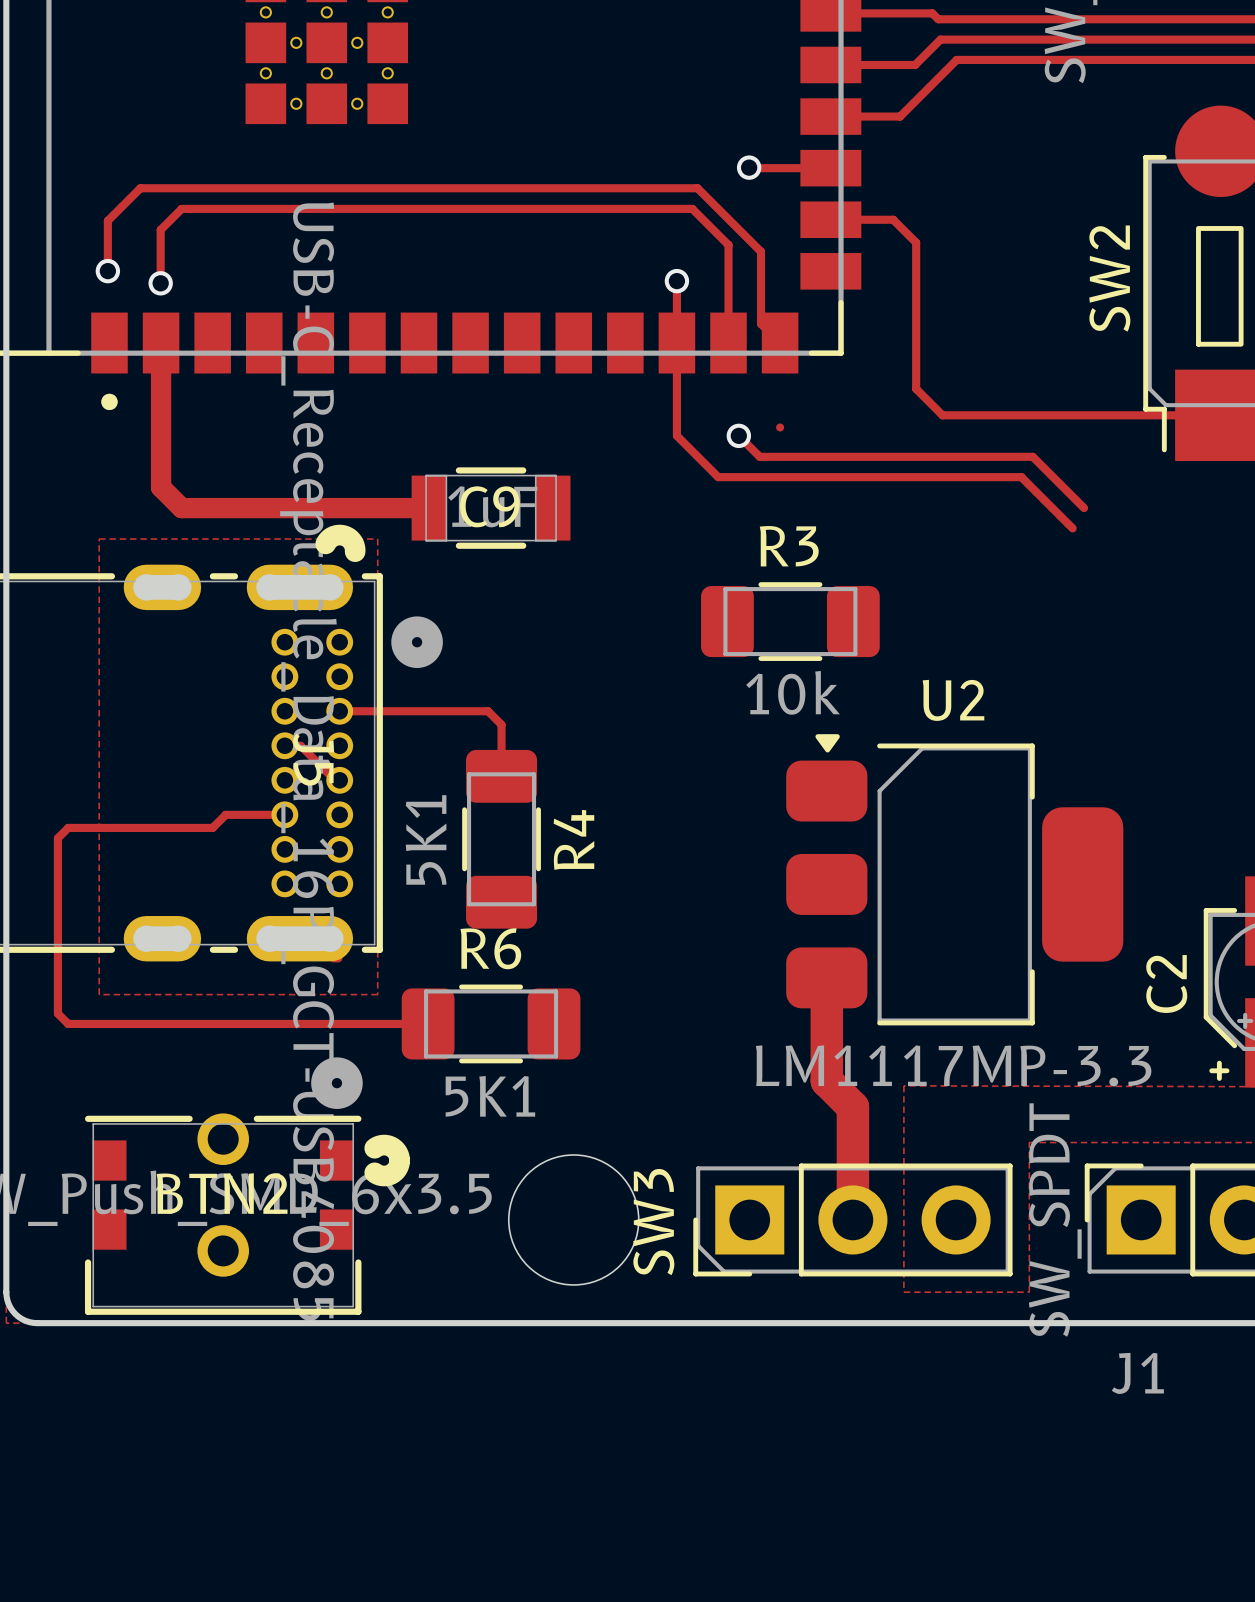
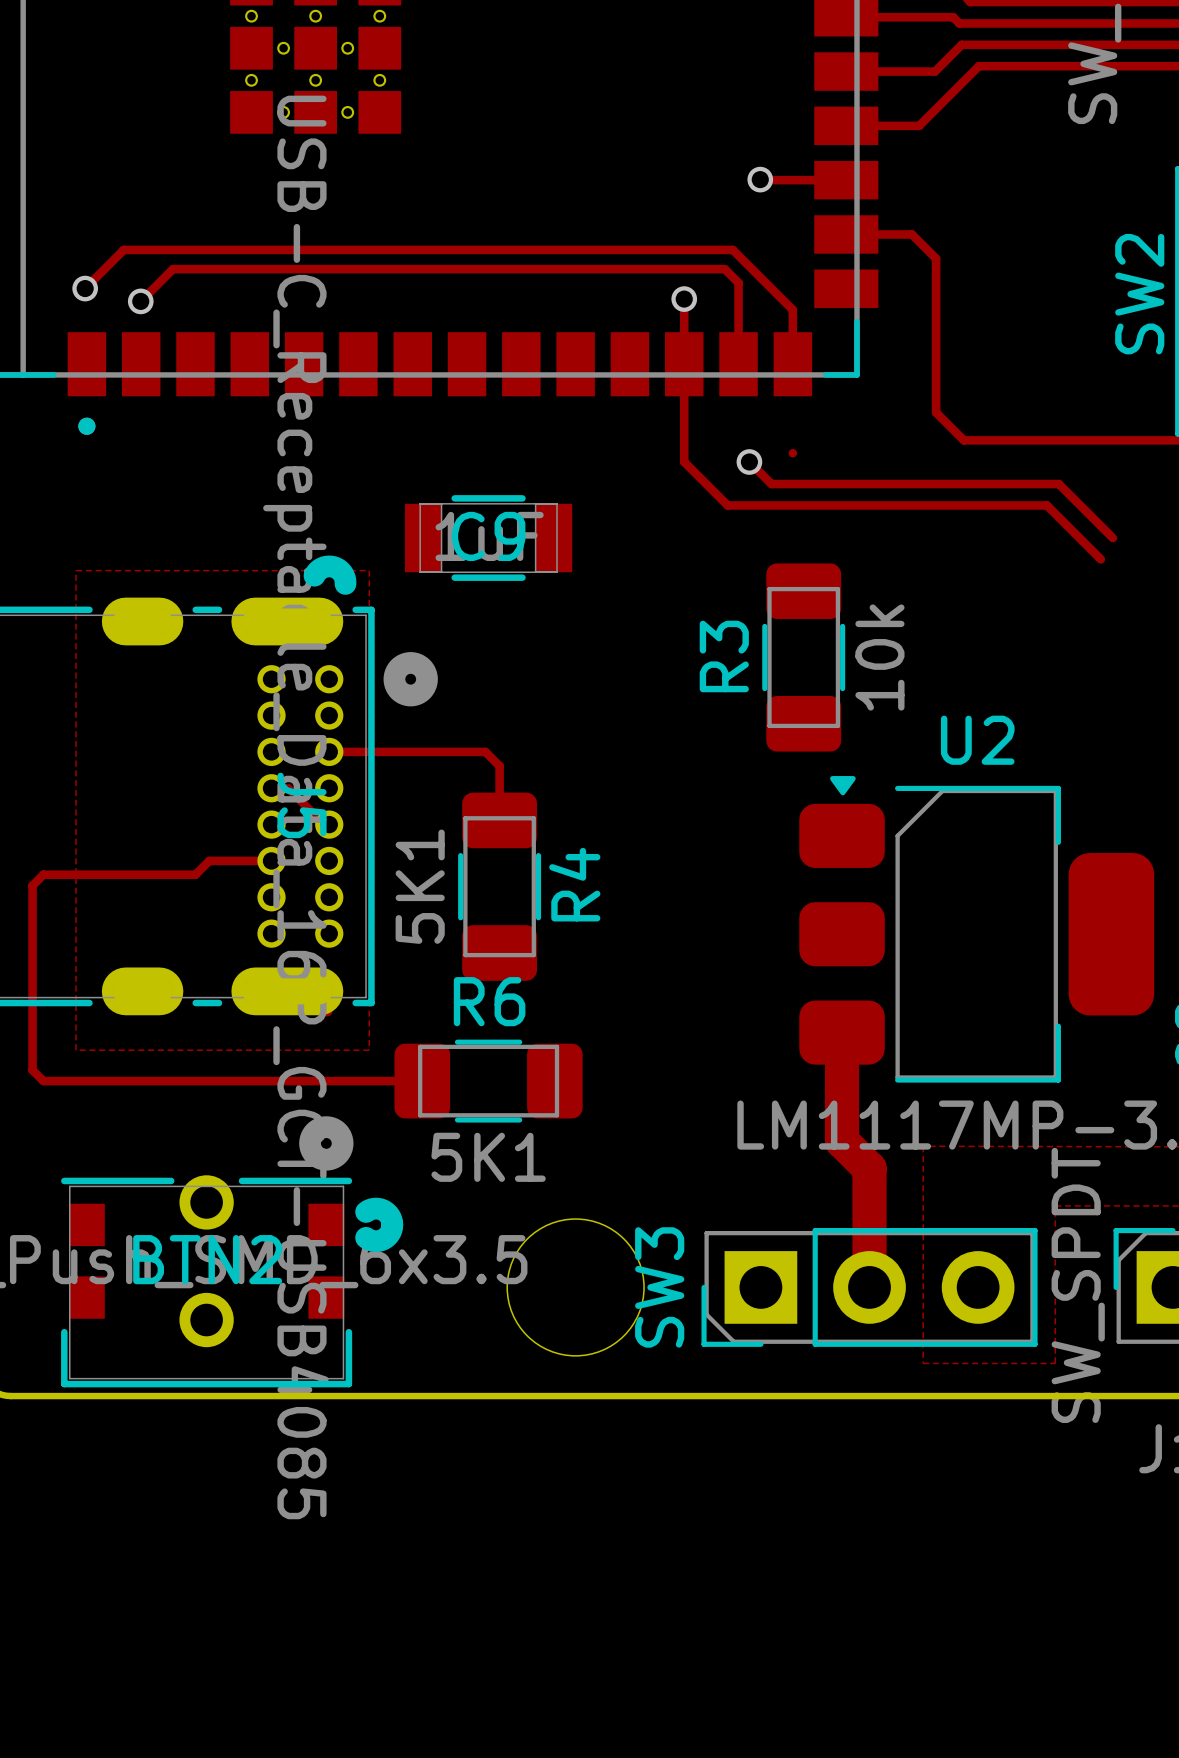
track: (728, 265) (728, 245) (692, 208) (181, 208) (160, 229) (160, 283) -> (738, 282) (724, 269) (173, 269) (140, 301)
track: (107, 271) (107, 220) (140, 188) (697, 188) (761, 251) (761, 323) (780, 343) -> (85, 288) (123, 249) (732, 249) (792, 309) (792, 364)
track: (161, 343) (161, 487) (181, 508) (429, 508) -> none
R3 name position: R3 (789, 546) -> R3 (724, 656)
R3 rotation: 0° (790, 621) -> 90° clockwise (803, 657)
R3 value position: 10k (793, 692) -> 10k (879, 657)

